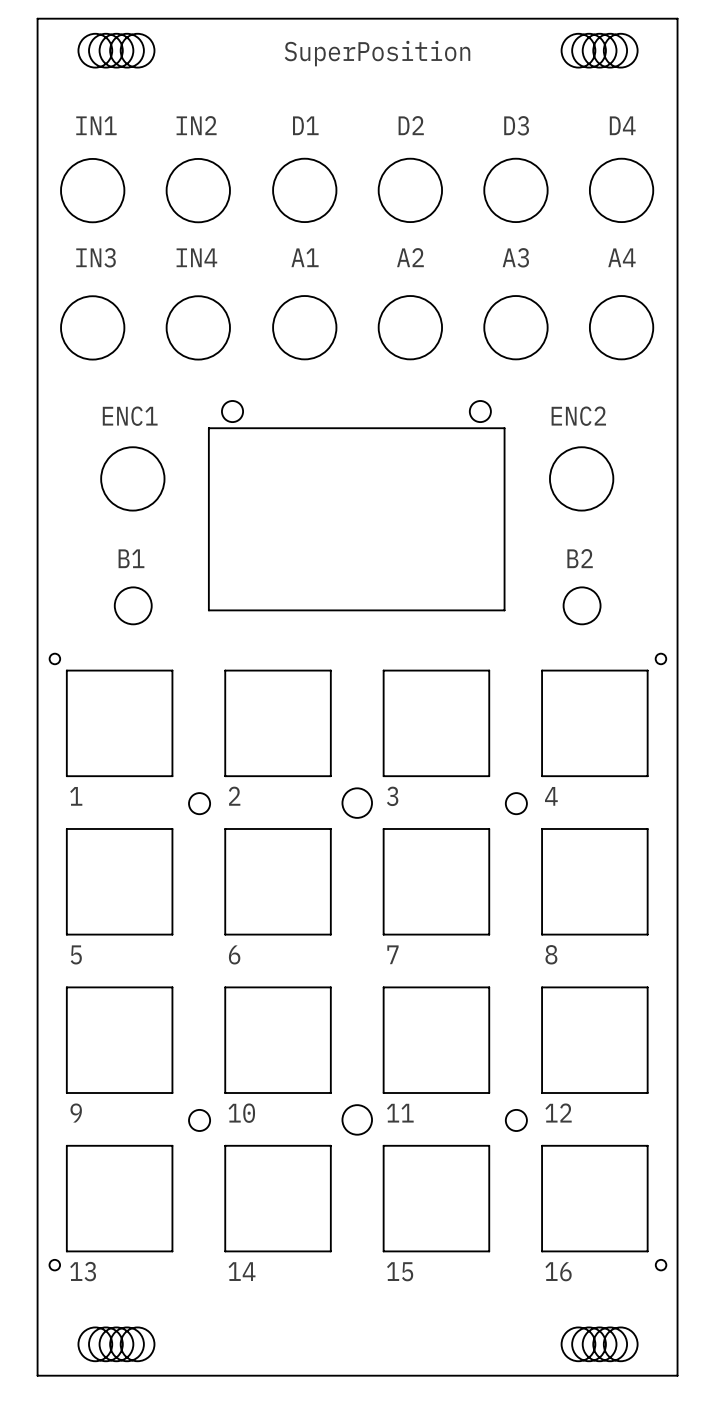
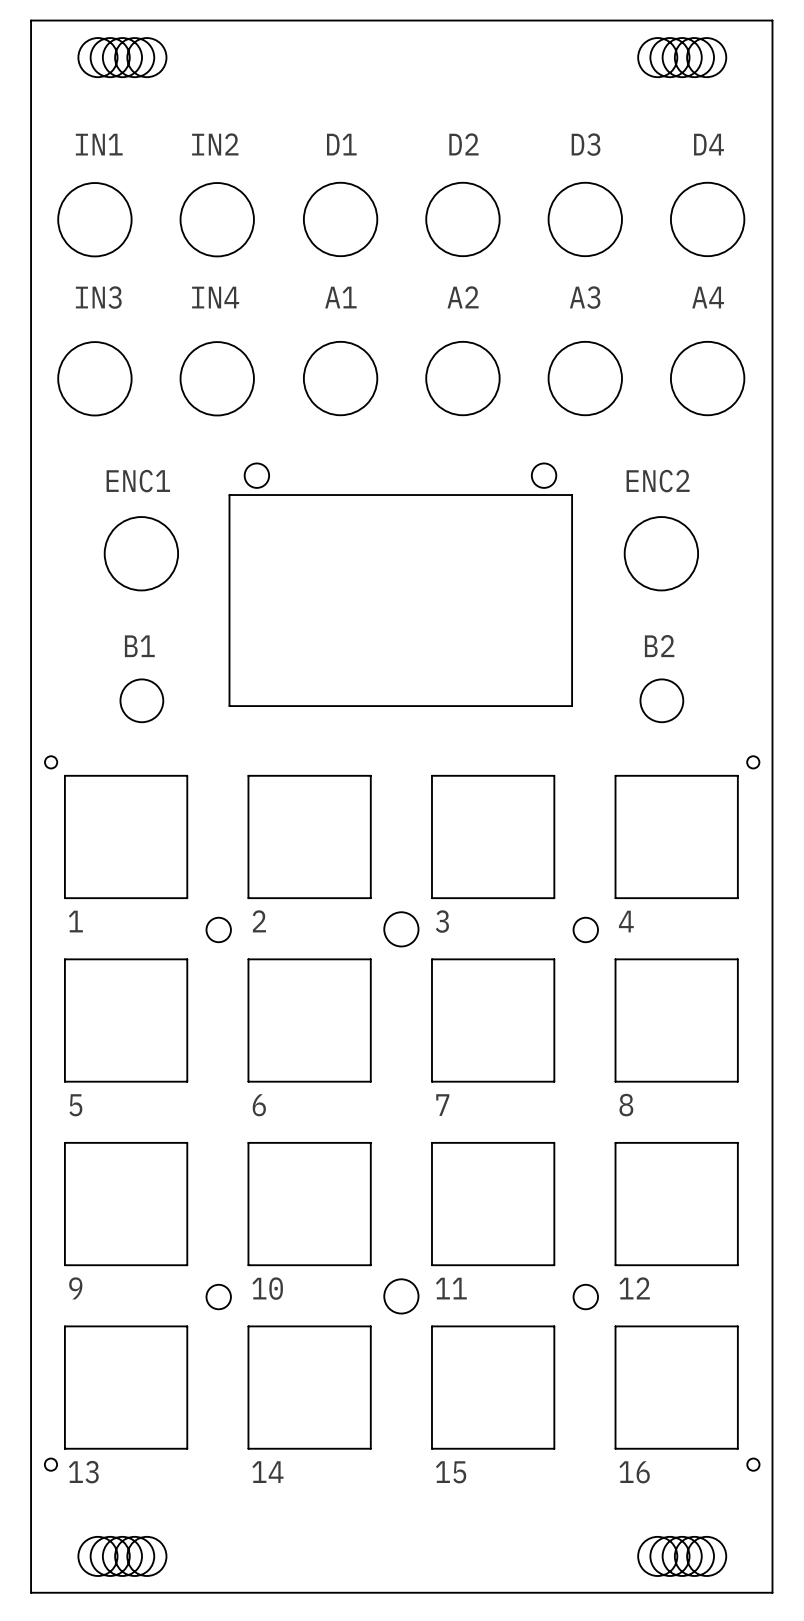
text: SuperPosition (377, 53) -> none

